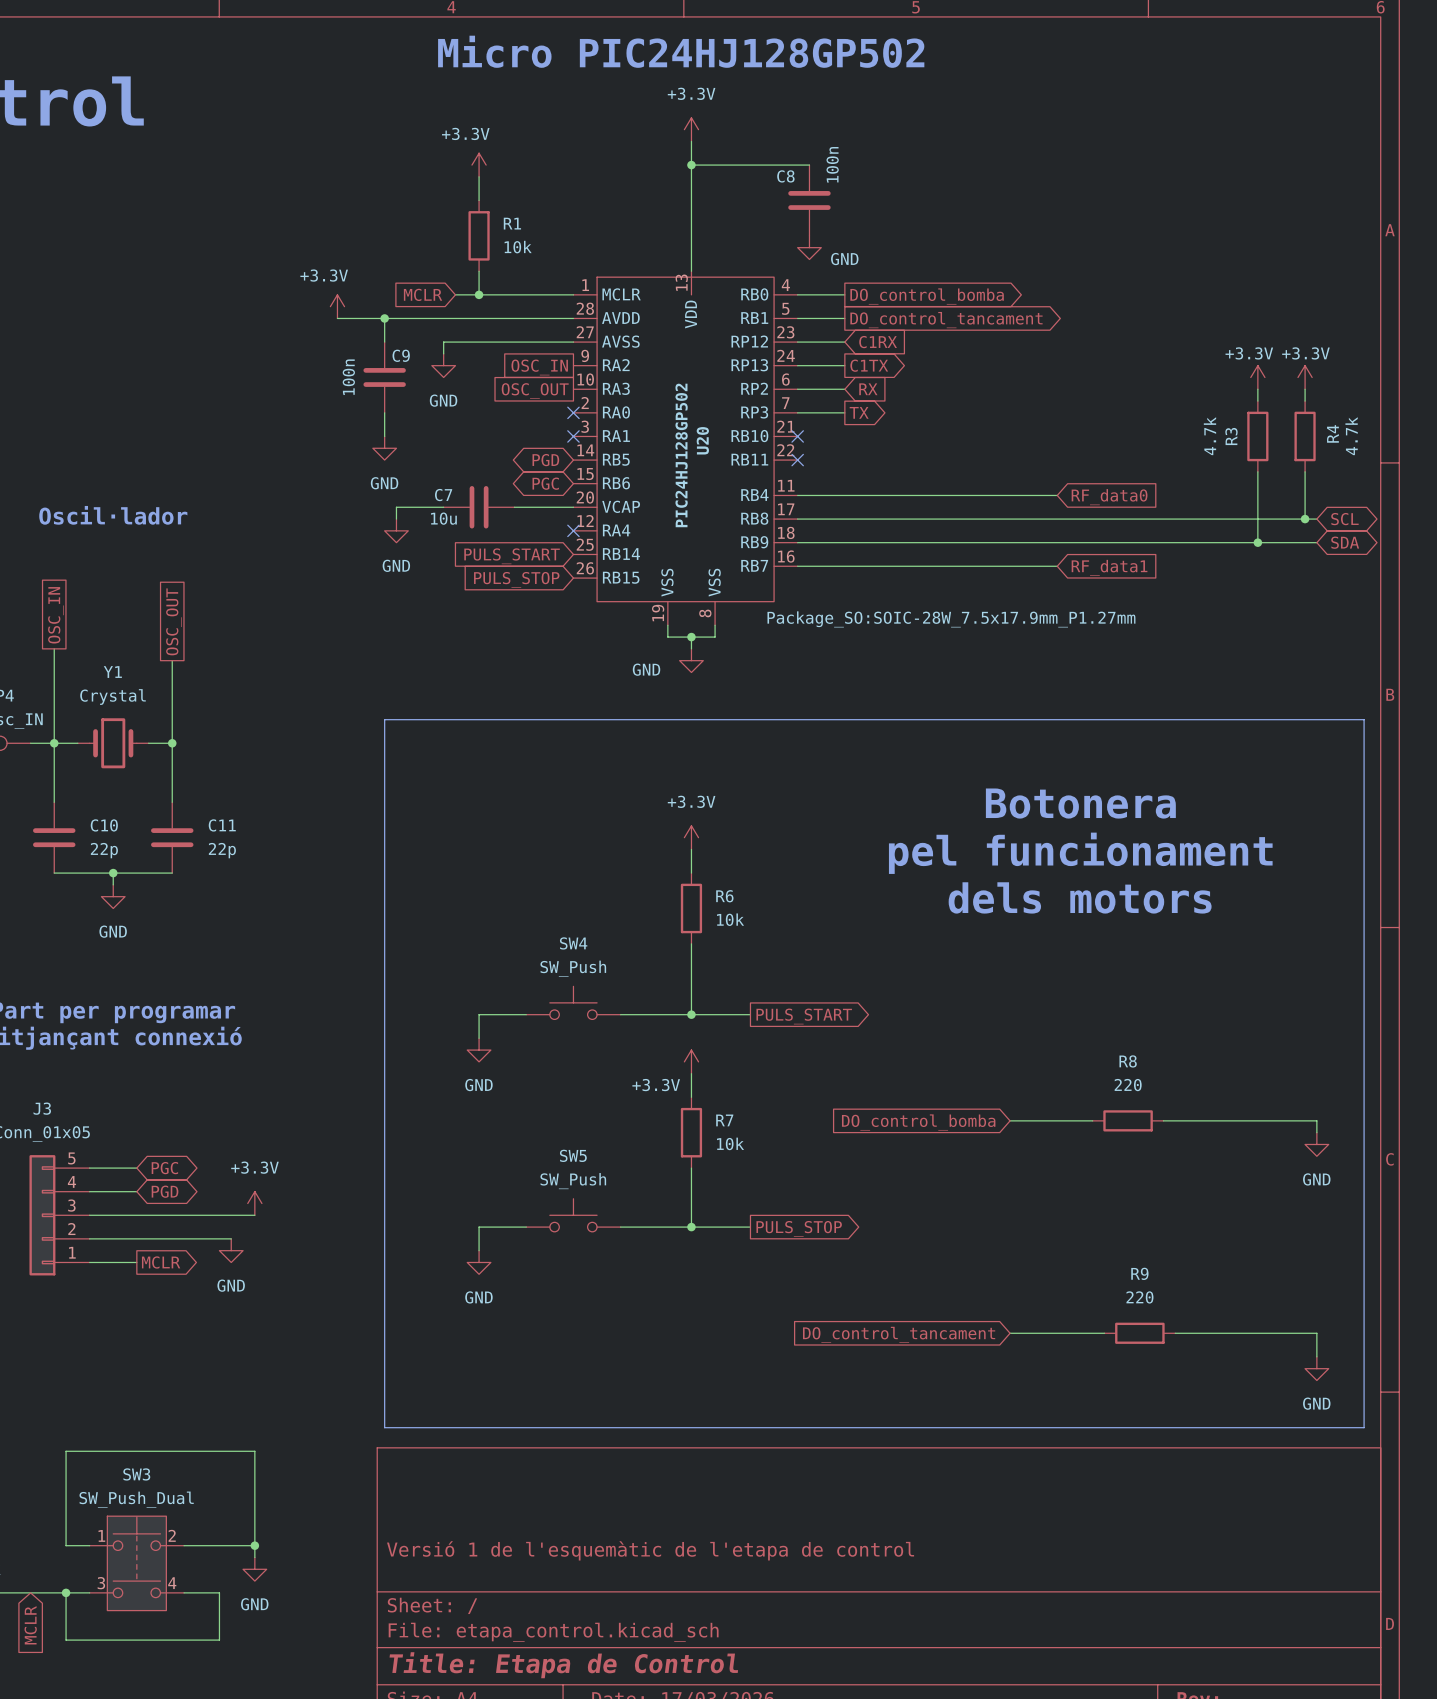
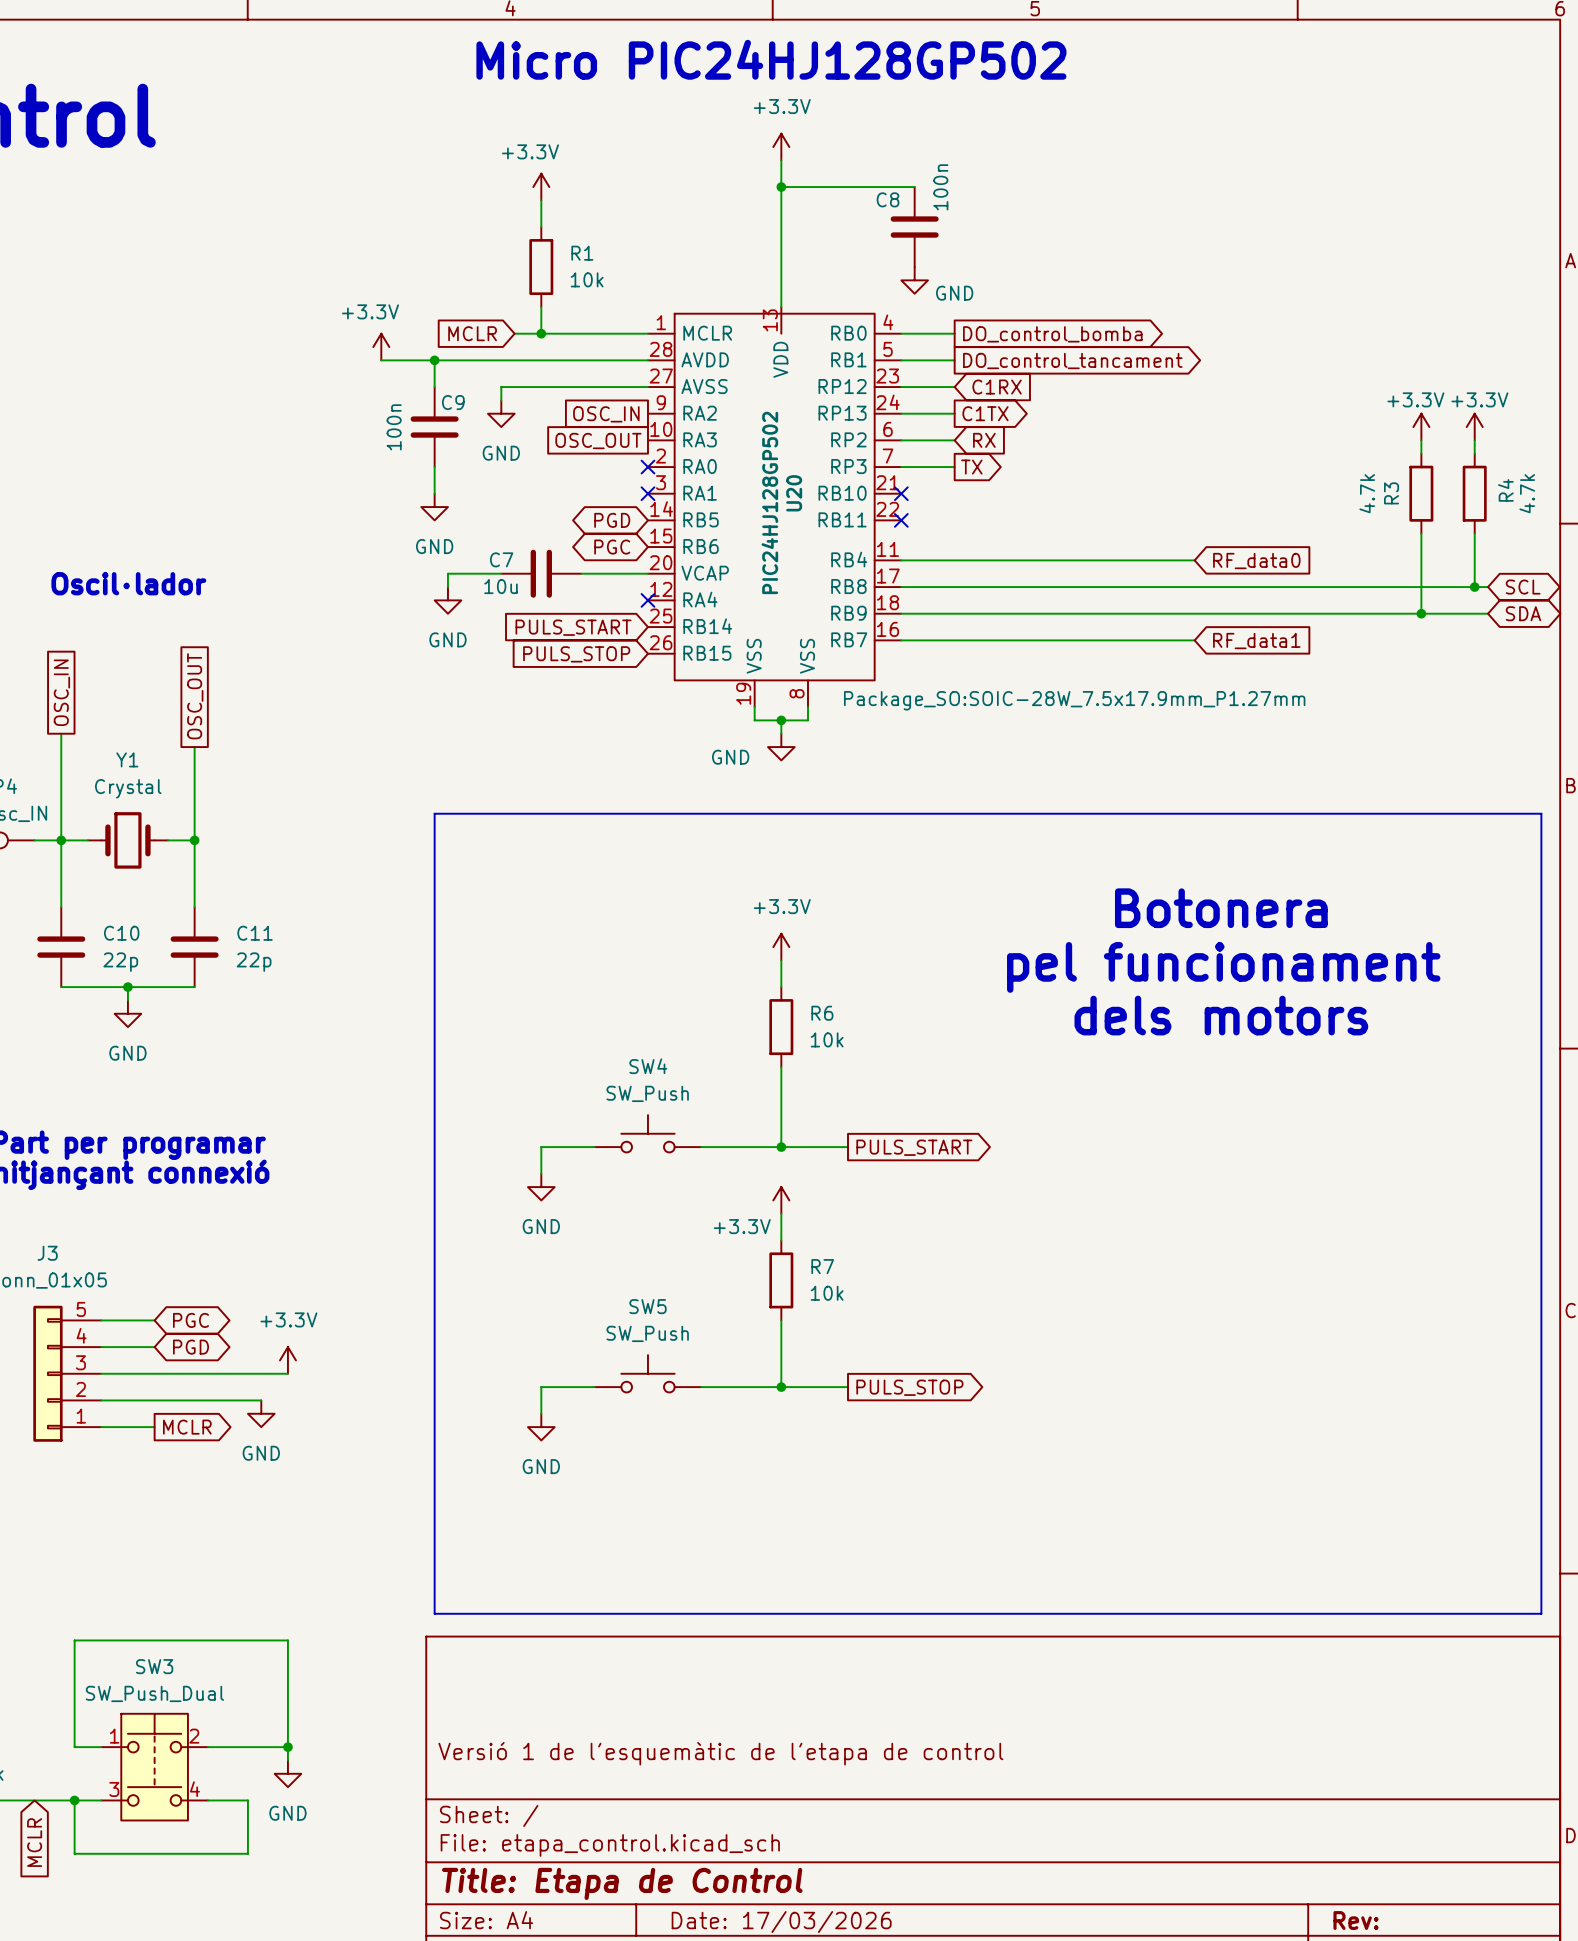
wire: (1010, 1120) (1092, 1120) -> none
R8: 220 (1128, 1120) -> none
wire: (1163, 1120) (1316, 1120) (1316, 1132) -> none
global label: DO_control_bomba (918, 1122) -> none
power symbol: GND (1316, 1144) -> none
wire: (1010, 1333) (1104, 1333) -> none
R9: 220 (1139, 1333) -> none
wire: (1175, 1333) (1316, 1333) (1316, 1356) -> none
global label: DO_control_tancament (899, 1334) -> none
power symbol: GND (1316, 1368) -> none

